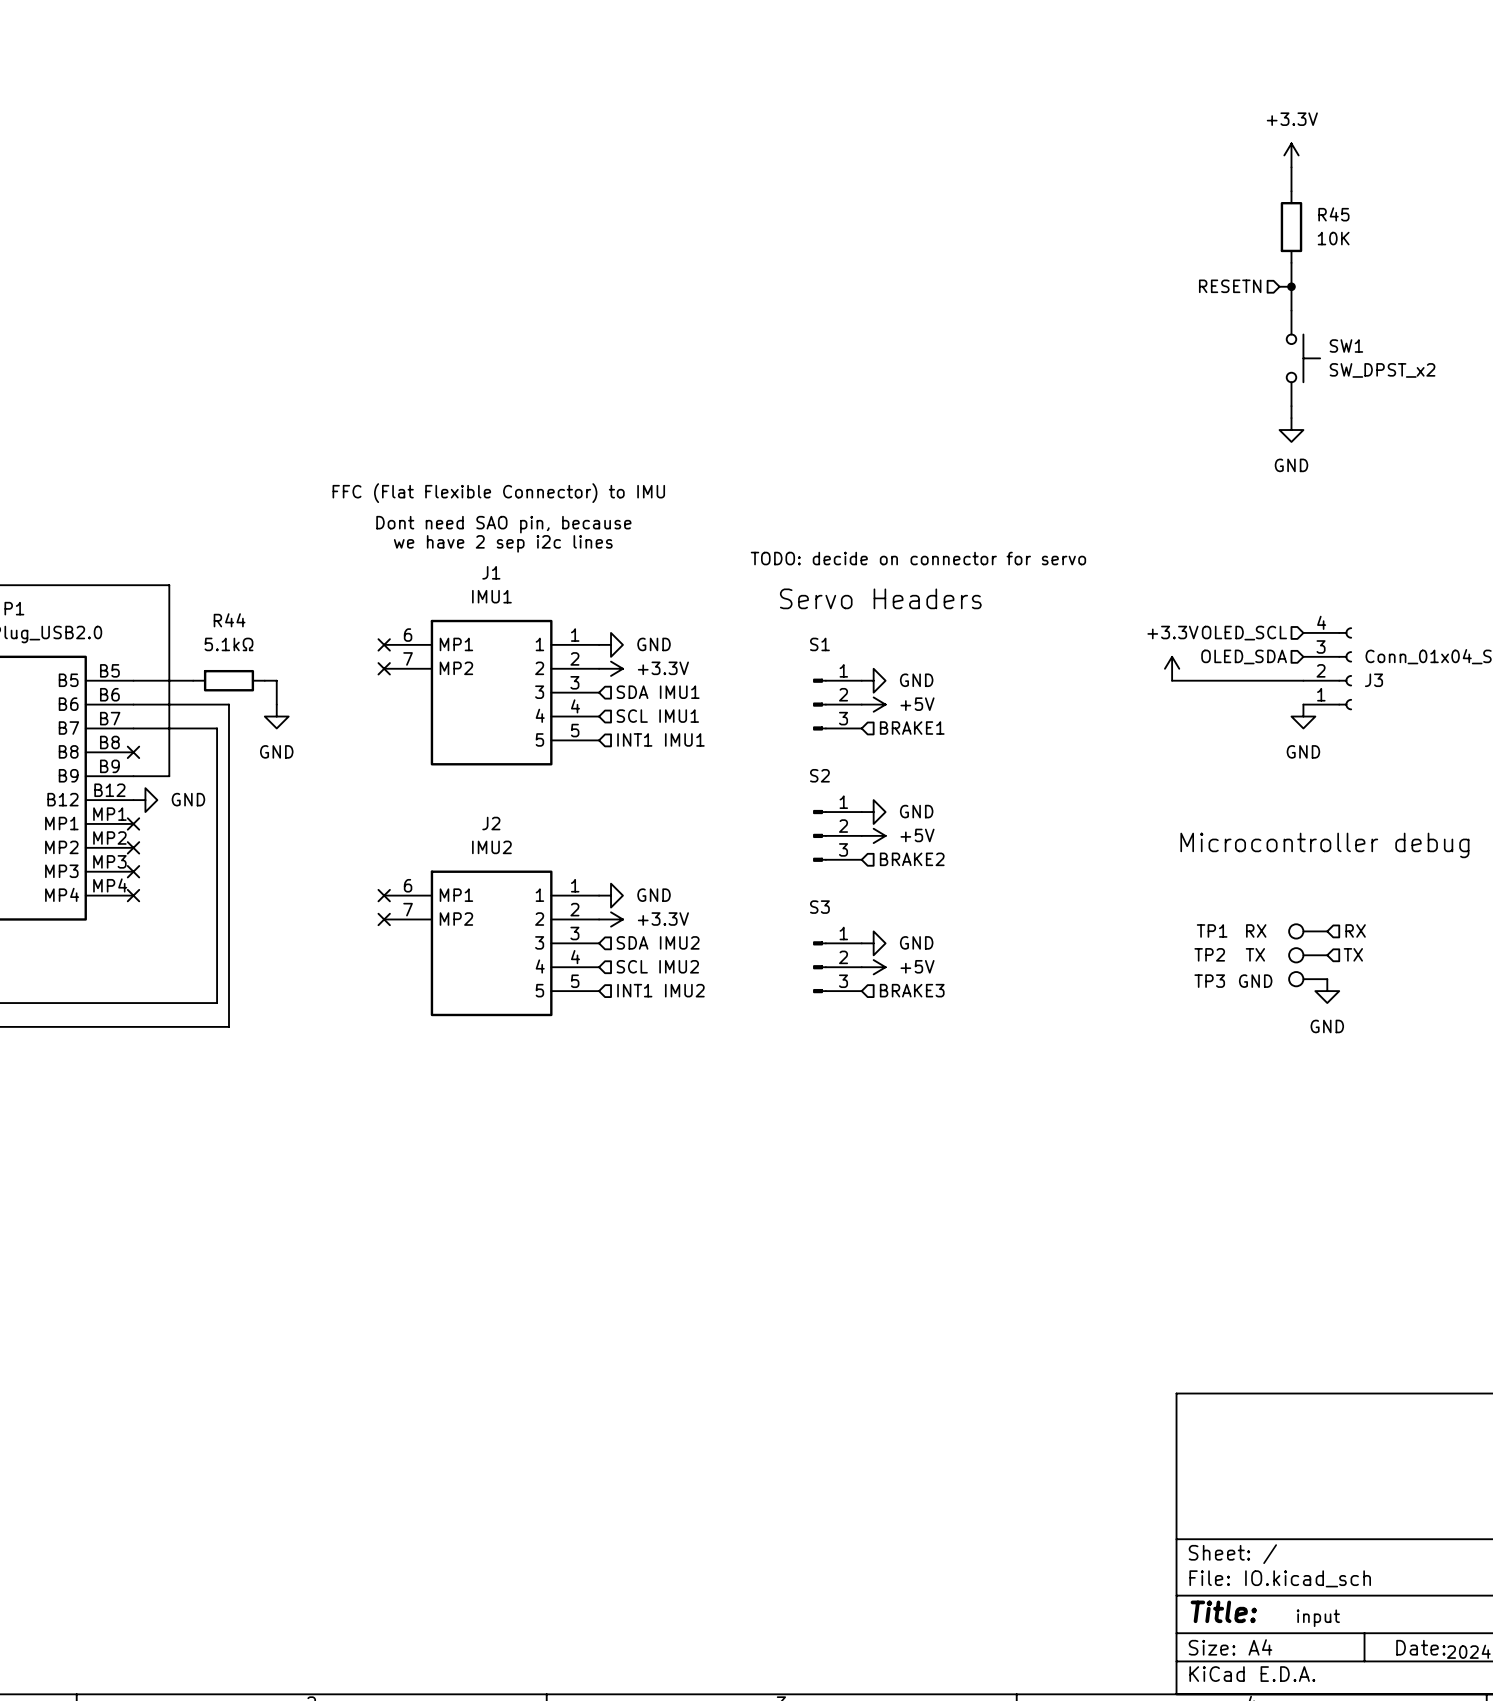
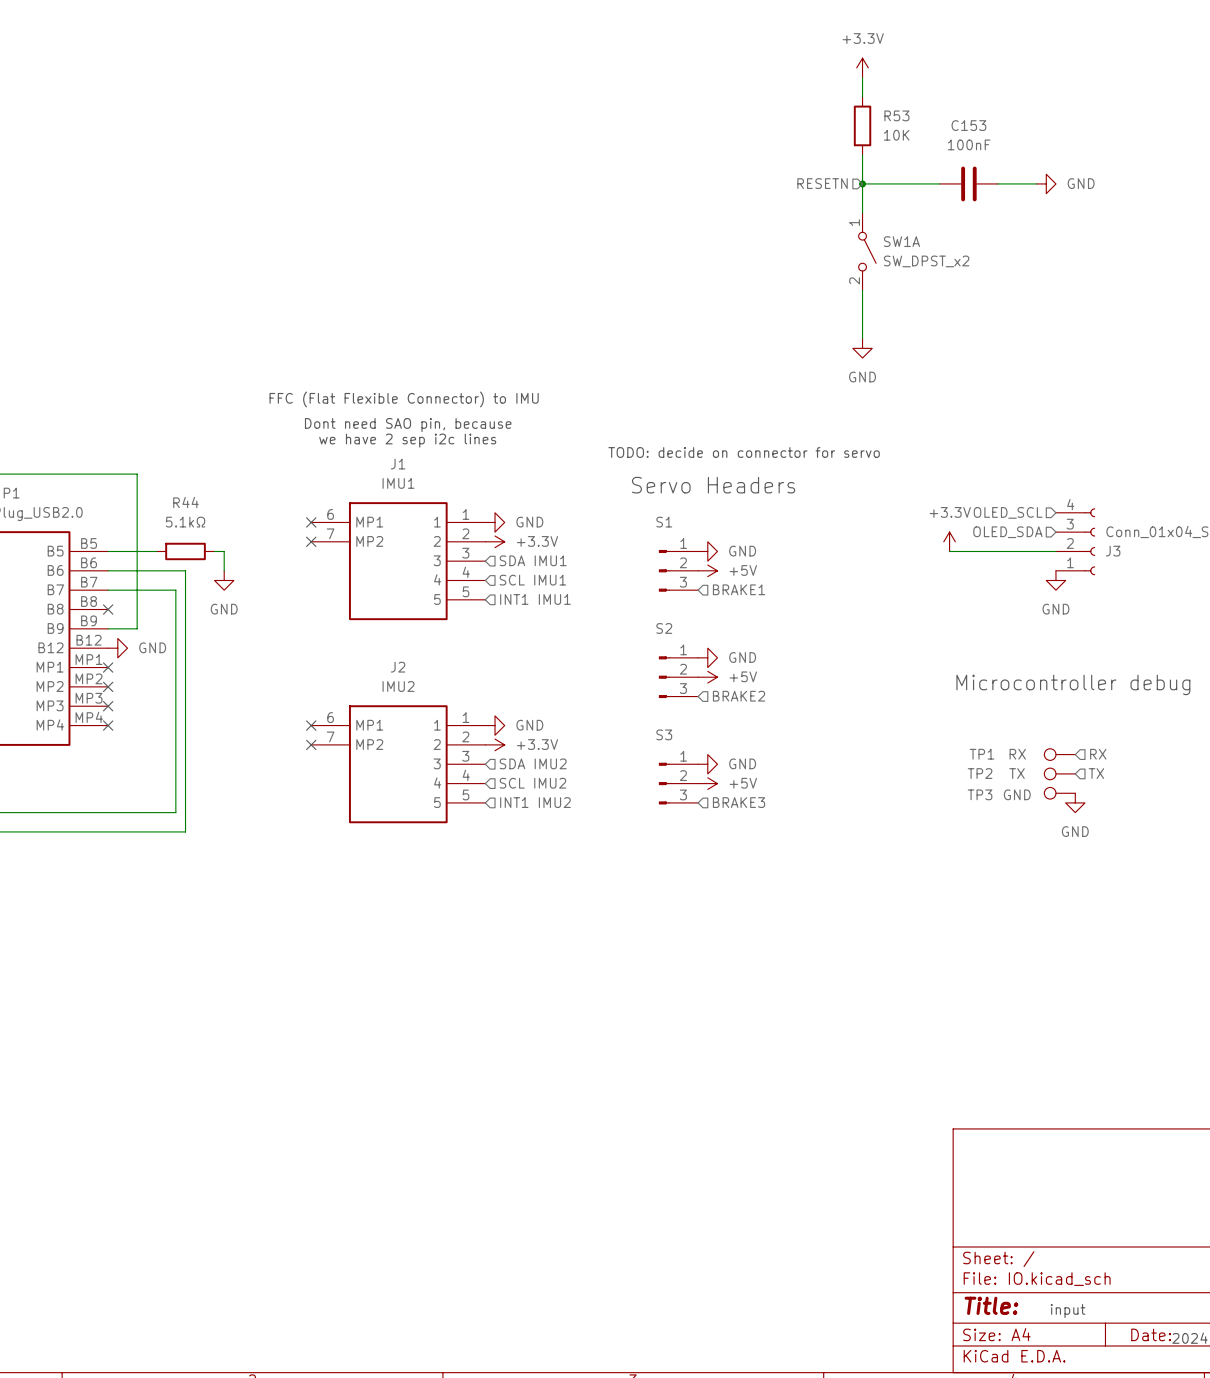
power symbol: none -> +3.3V (862, 67)
wire: none -> (862, 77) (862, 96)
R53: none -> 10K (862, 125)
power symbol: +3.3V (1291, 155) -> none
wire: (1291, 167) (1291, 191) -> none
wire: none -> (862, 154) (862, 212)
wire: none -> (862, 183) (939, 183)
junction: none -> (862, 183)
C153: none -> 100nF (968, 183)
wire: none -> (997, 183) (1036, 183)
power symbol: none -> GND (1046, 183)
R45: 10K (1291, 227) -> none
wire: (1291, 262) (1291, 310) -> none
hierarchical label position: RESETN (1230, 286) -> RESETN (822, 183)
wire: (1279, 286) (1291, 286) -> none
junction: (1291, 286) -> none
SW1A: none -> SW_DPST_x2 (867, 251)
wire: none -> (862, 290) (862, 338)
SW1: SW_DPST_x2 (1303, 358) -> none
wire: (1291, 406) (1291, 418) -> none
power symbol: none -> GND (862, 348)
power symbol: GND (1291, 430) -> none

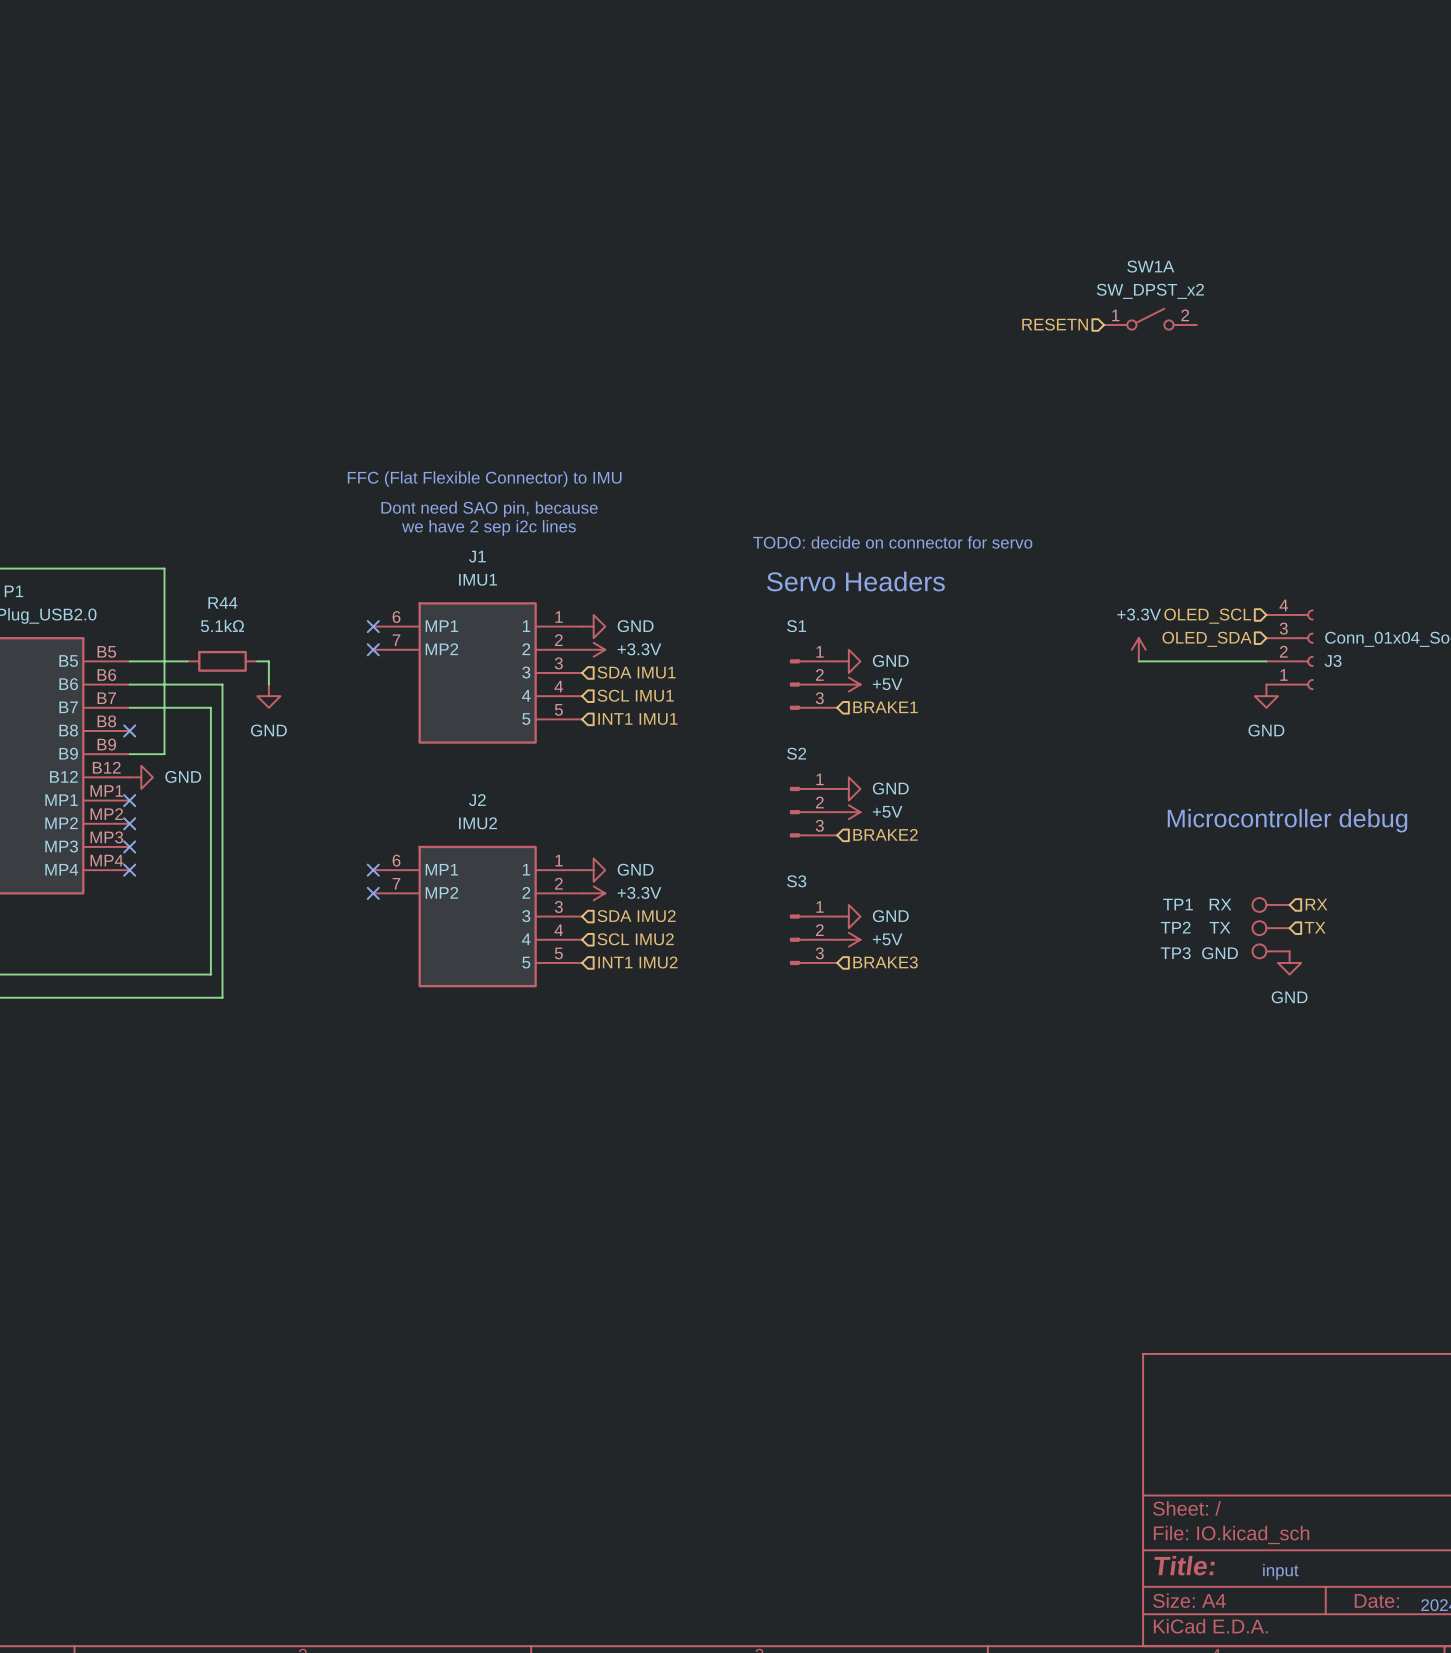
power symbol: +3.3V (862, 67) -> none
wire: (862, 77) (862, 96) -> none
R53: 10K (862, 125) -> none
wire: (862, 154) (862, 212) -> none
hierarchical label position: RESETN (822, 183) -> RESETN (1055, 324)
wire: (862, 183) (939, 183) -> none
junction: (862, 183) -> none
C153: 100nF (968, 183) -> none
wire: (997, 183) (1036, 183) -> none
power symbol: GND (1046, 183) -> none
SW1A rotation: 0° (867, 251) -> 90° counterclockwise (1150, 319)
SW1A position: (867, 251) -> (1150, 319)
SW1A value position: SW_DPST_x2 (926, 261) -> SW_DPST_x2 (1150, 291)
wire: (862, 290) (862, 338) -> none
power symbol: GND (862, 348) -> none

